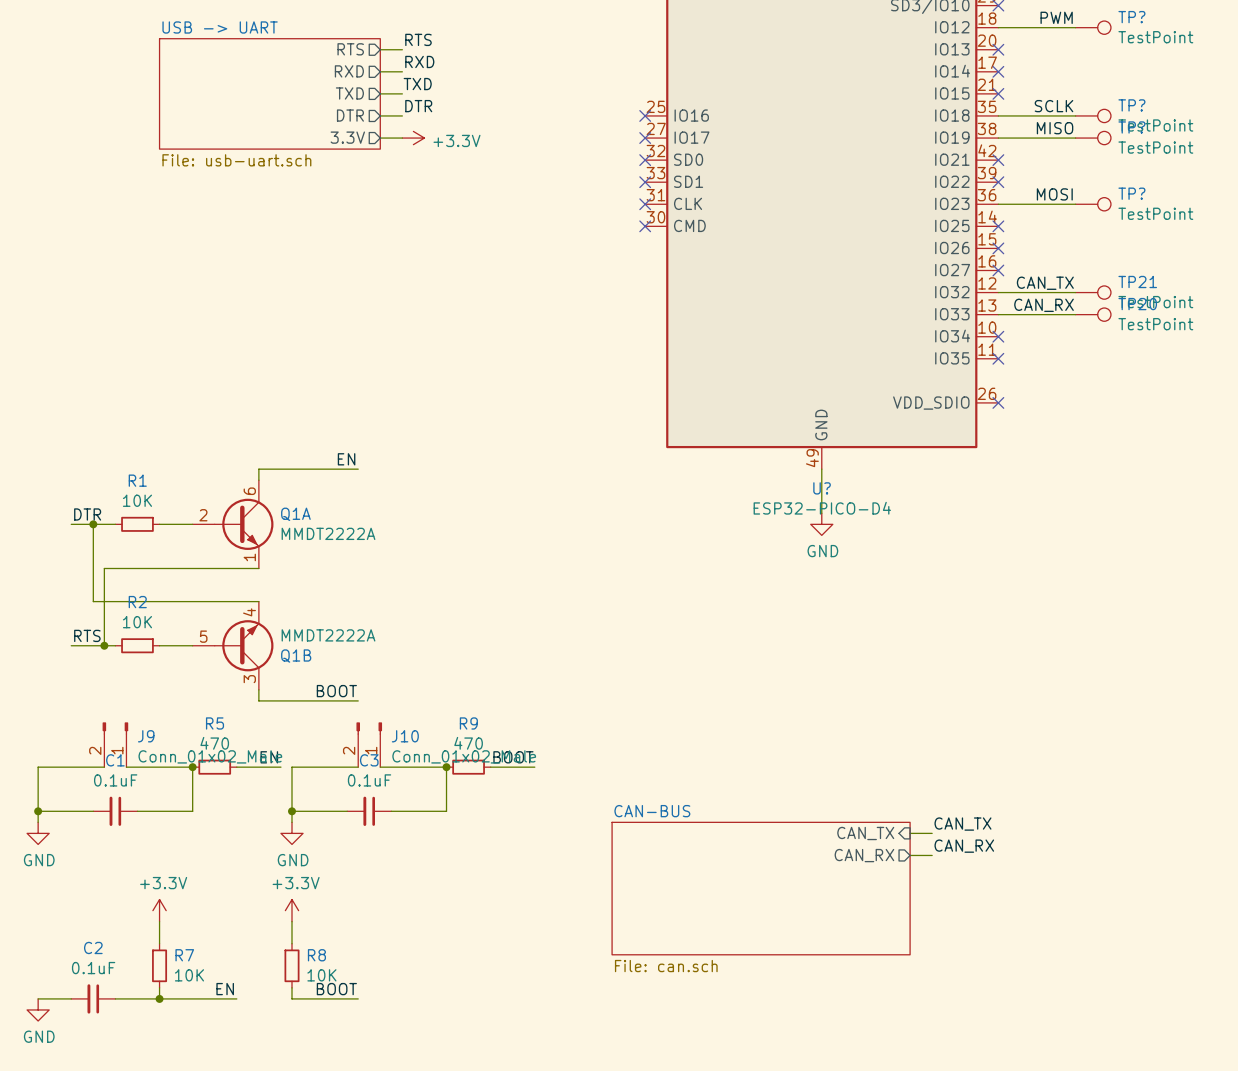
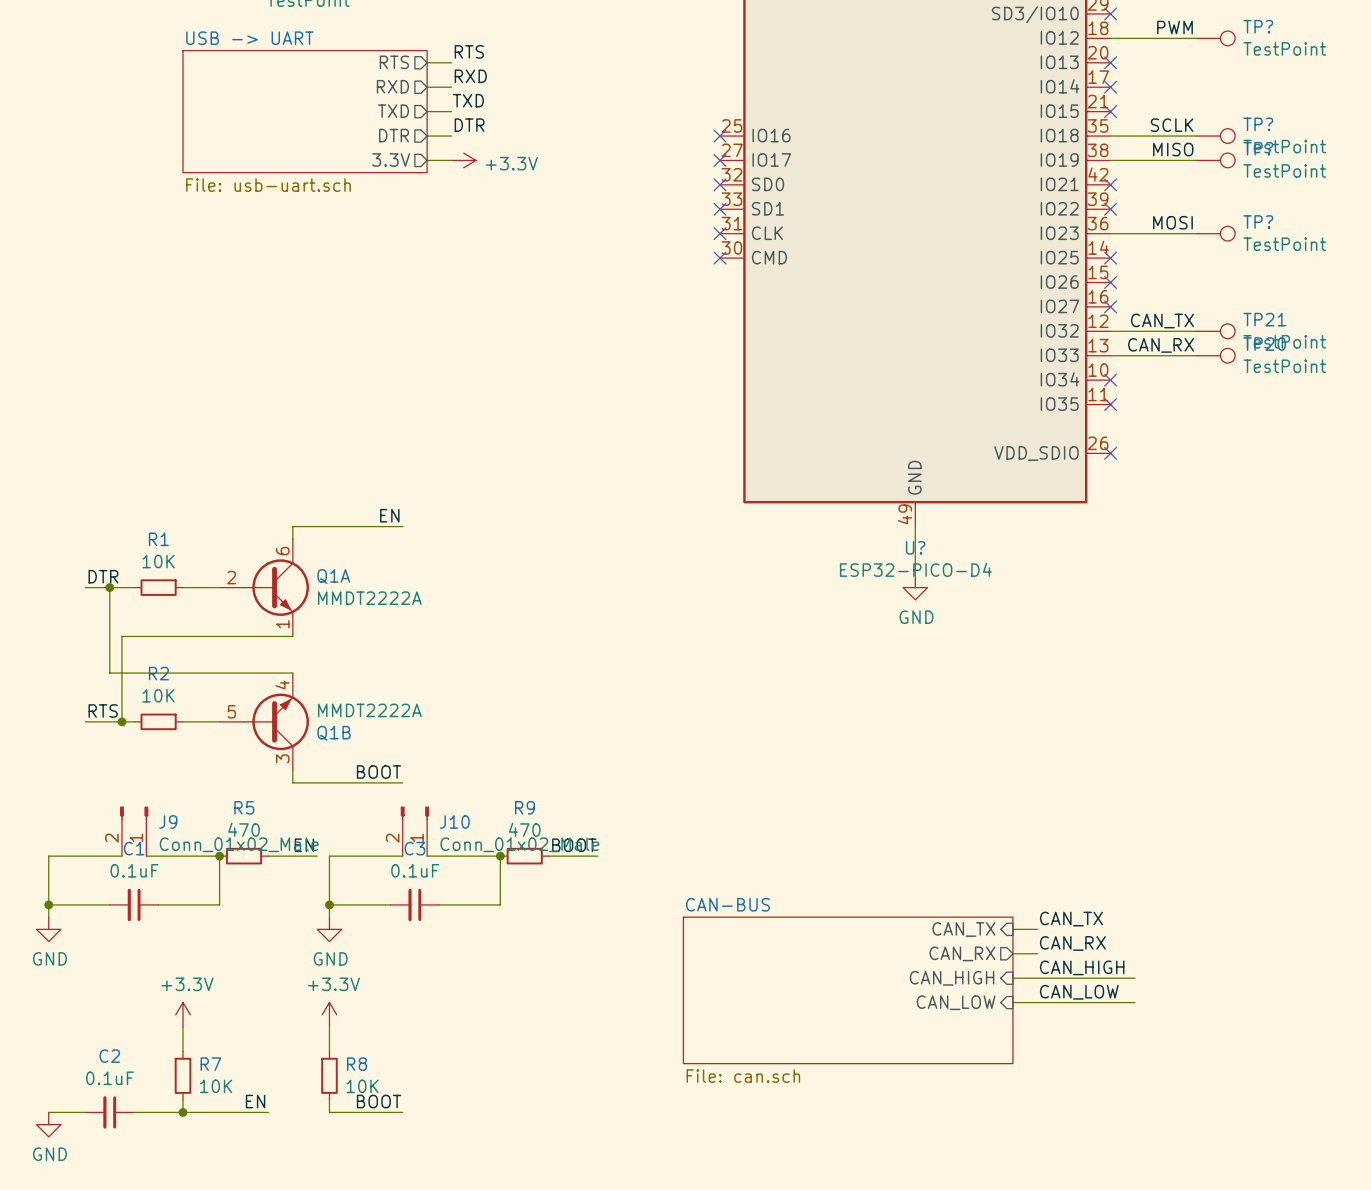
label: none -> CAN_HIGH (1082, 967)
sheet pin: none -> CAN_HIGH (952, 978)
wire: none -> (1012, 978) (1135, 978)
label: none -> CAN_LOW (1079, 992)
sheet pin: none -> CAN_LOW (956, 1002)
wire: none -> (1012, 1002) (1135, 1002)

